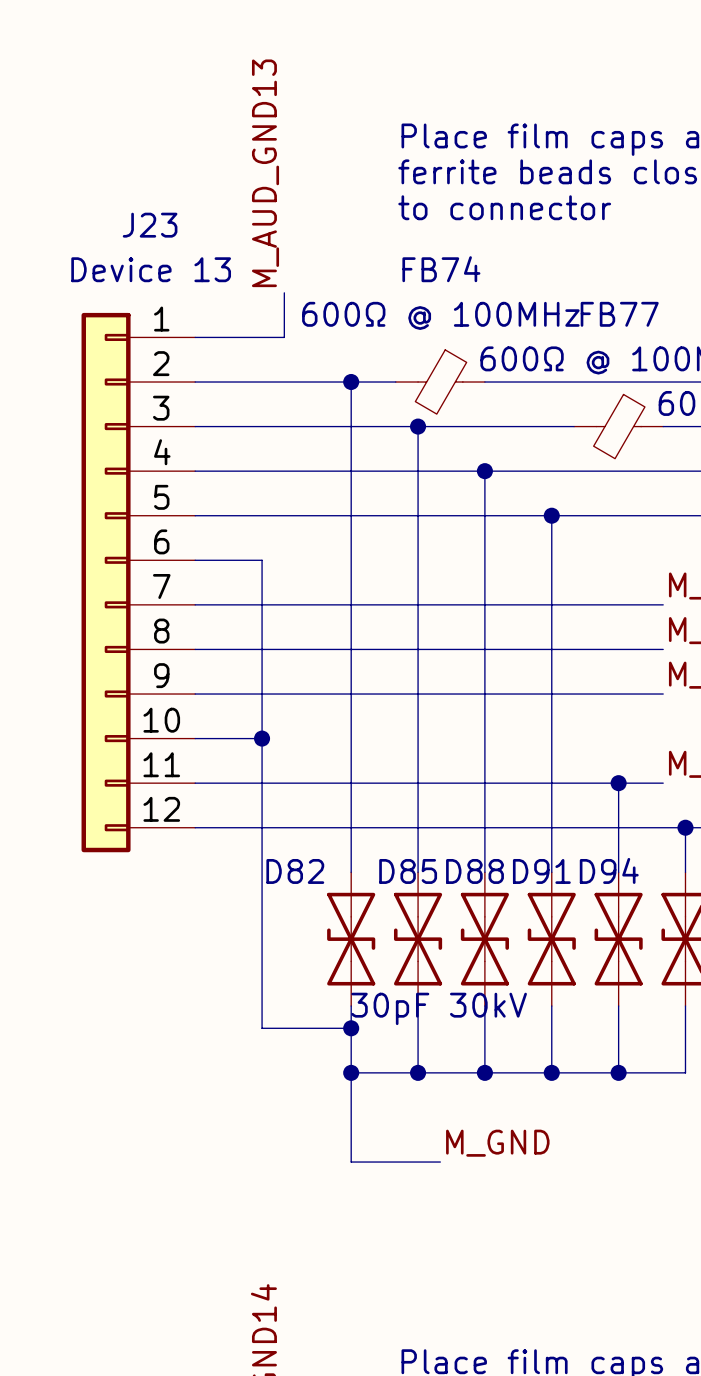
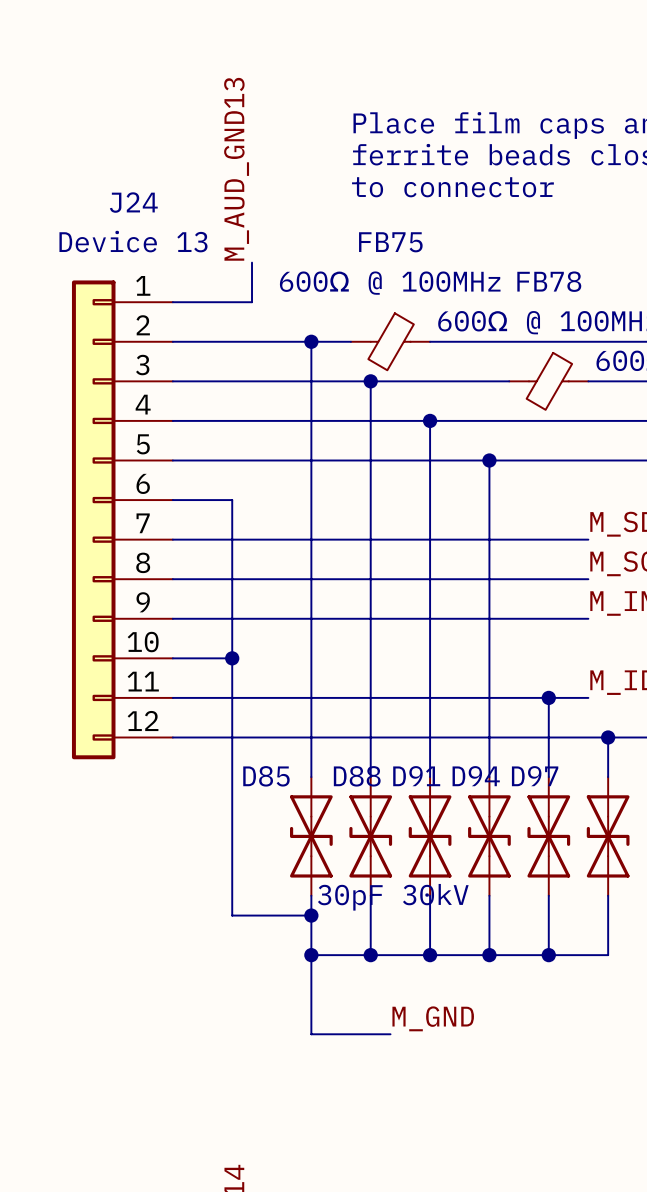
J23 name: J23 (150, 225) -> J24 (133, 202)
FB74 name: FB74 (441, 269) -> FB75 (390, 242)
FB77 name: FB77 (619, 314) -> FB78 (549, 281)
D94 name: D94 (609, 870) -> D97 (535, 776)
D82 name: D82 (295, 871) -> D85 (266, 776)
D85 name: D85 (408, 871) -> D88 (357, 776)
D88 name: D88 (474, 871) -> D91 (416, 776)
D91 name: D91 (541, 871) -> D94 (476, 776)

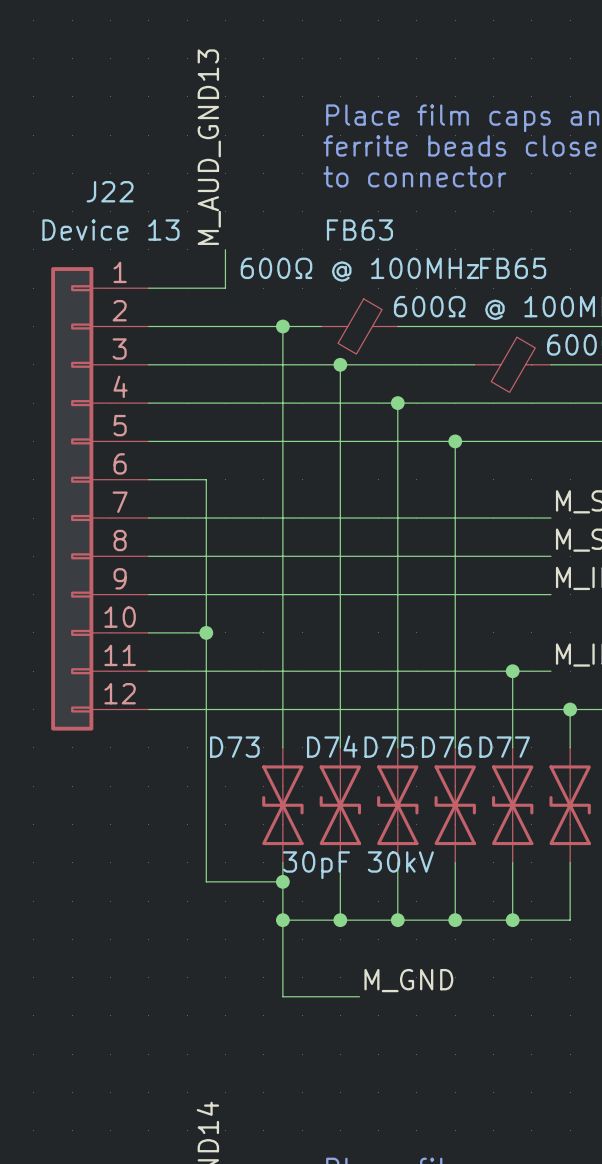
J24 name: J24 (133, 202) -> J22 (110, 191)
FB75 name: FB75 (390, 242) -> FB63 (359, 230)
FB78 name: FB78 (549, 281) -> FB65 (513, 268)
D85 name: D85 (266, 776) -> D73 (234, 747)
D88 name: D88 (357, 776) -> D74 (332, 746)
D91 name: D91 (416, 776) -> D75 (389, 747)
D94 name: D94 (476, 776) -> D76 (446, 747)
D97 name: D97 (535, 776) -> D77 (504, 747)

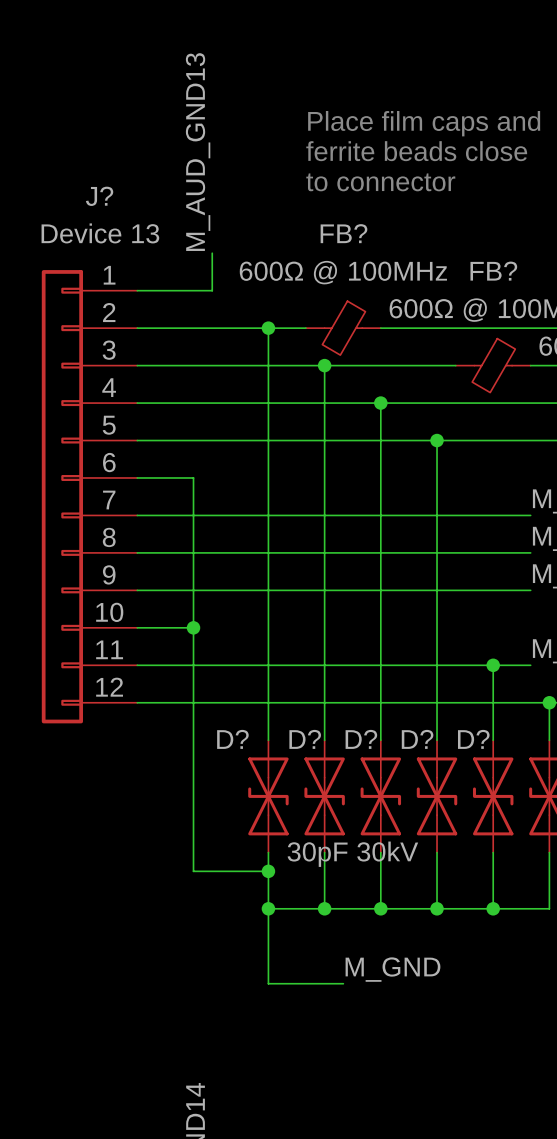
J22 name: J22 (110, 191) -> J? (99, 196)
FB63 name: FB63 (359, 230) -> FB? (343, 233)
FB65 name: FB65 (513, 268) -> FB? (493, 271)
D74 name: D74 (332, 746) -> D? (305, 739)
D73 name: D73 (234, 747) -> D? (232, 739)
D75 name: D75 (389, 747) -> D? (361, 739)
D76 name: D76 (446, 747) -> D? (417, 739)
D77 name: D77 (504, 747) -> D? (473, 739)

